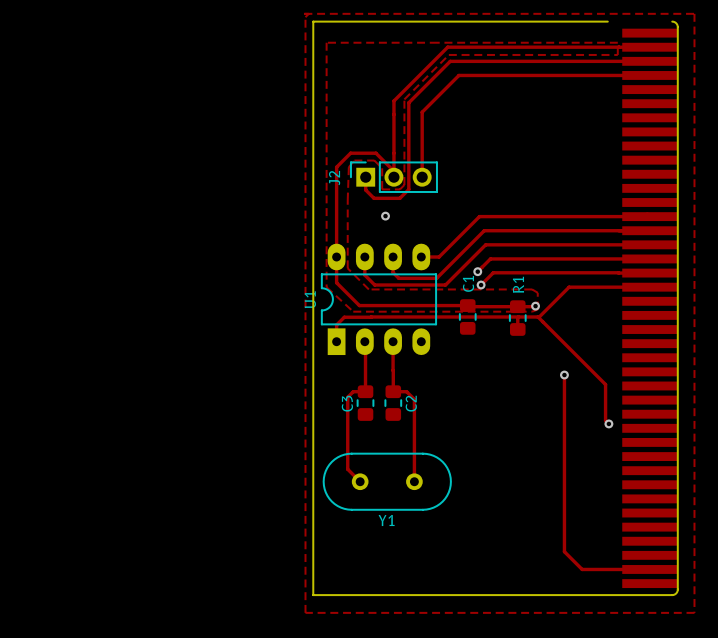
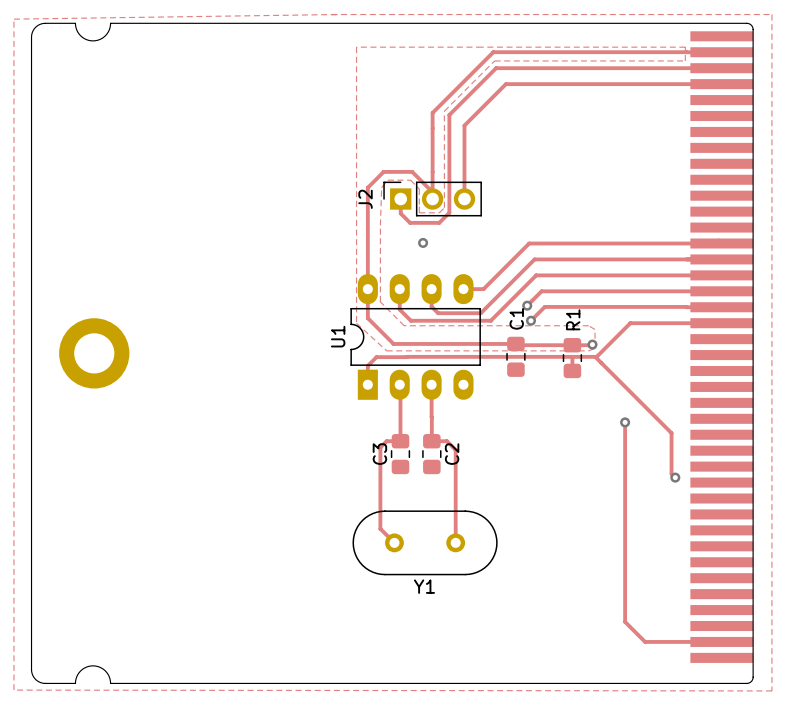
zone outline: (308, 13) (305, 17) (305, 612) (694, 612) -> (336, 14) (13, 19) (13, 690) (771, 690)
board edge: (313, 21) (313, 595) (672, 595) (676, 593) (677, 589) -> (341, 23) (110, 23) (105, 35) (93, 40) (80, 35) (75, 23) (43, 23) (36, 26) (32, 31) (31, 669) (33, 676) (43, 683) (75, 683) (80, 671) (93, 665) (105, 671) (110, 683) (746, 683) (752, 678) (753, 664)
board edge: none -> (674, 23) (746, 23)
part: none -> (94, 353)

